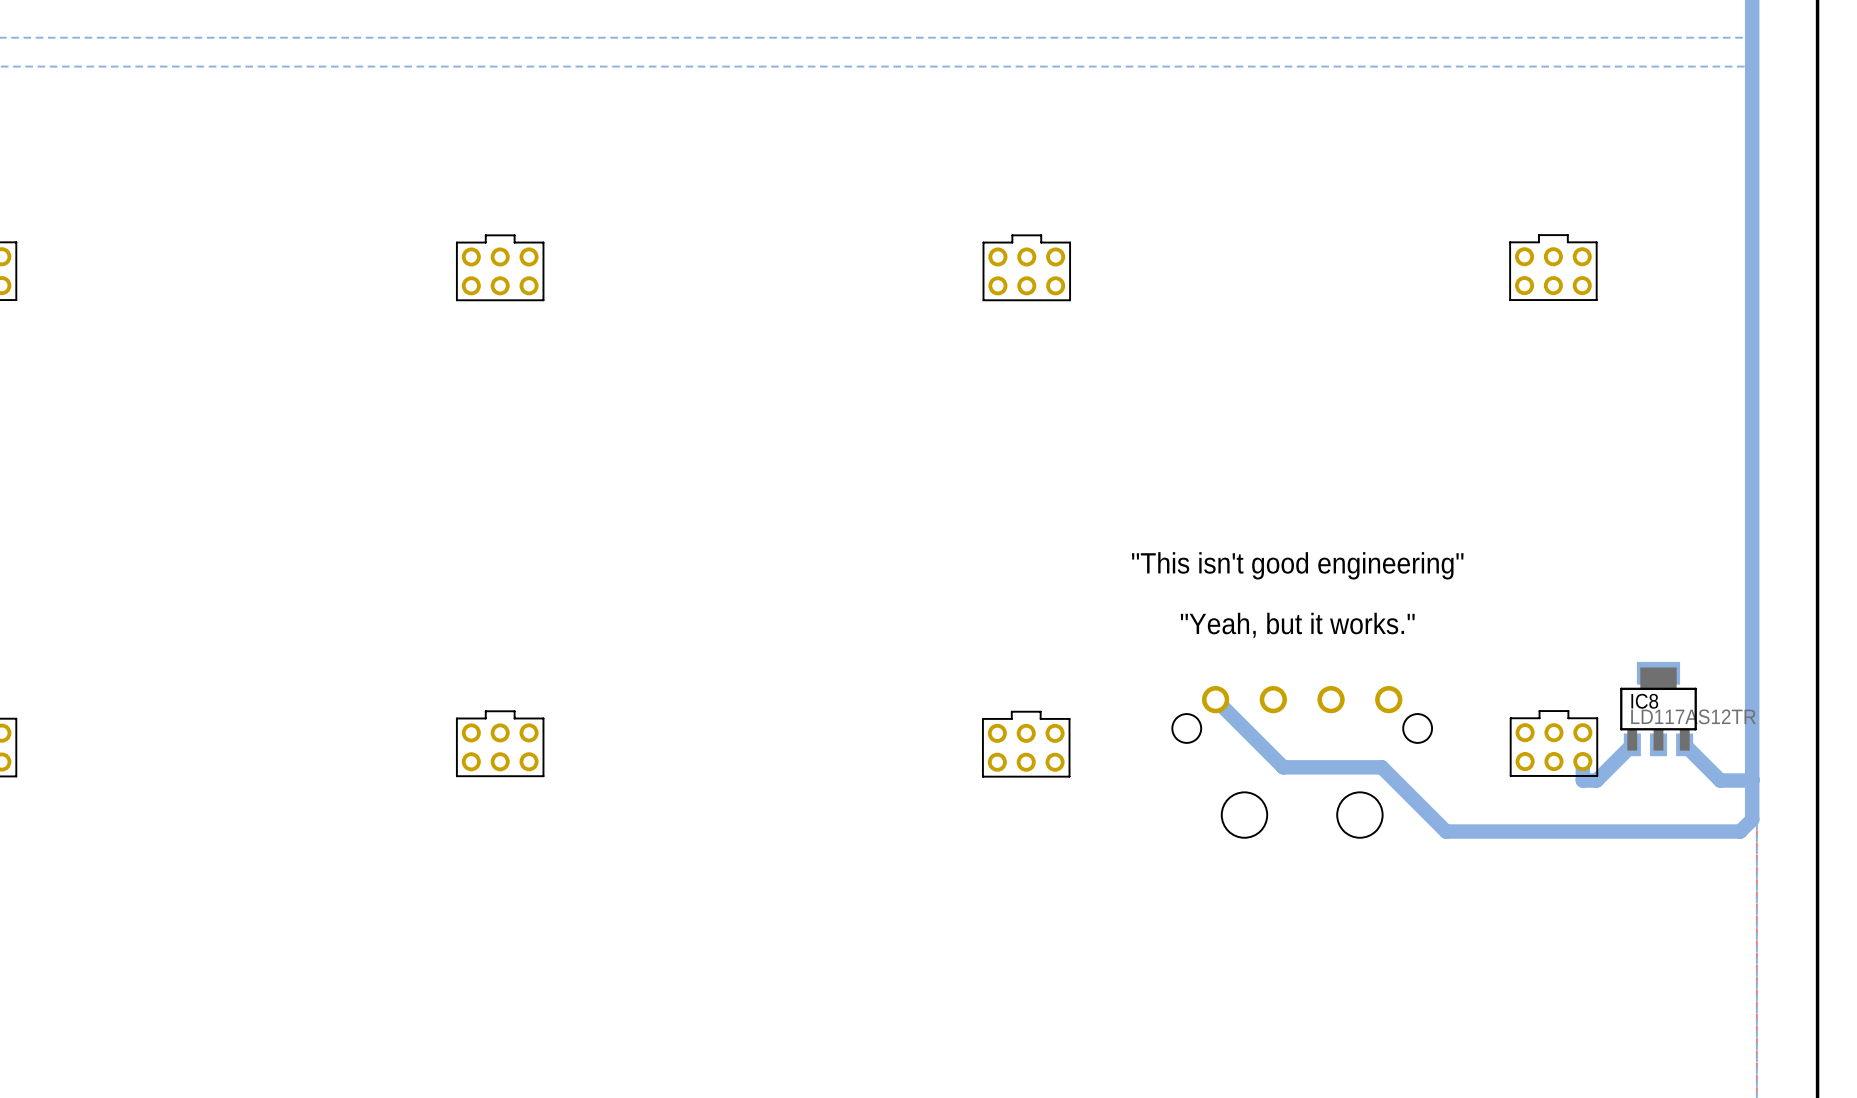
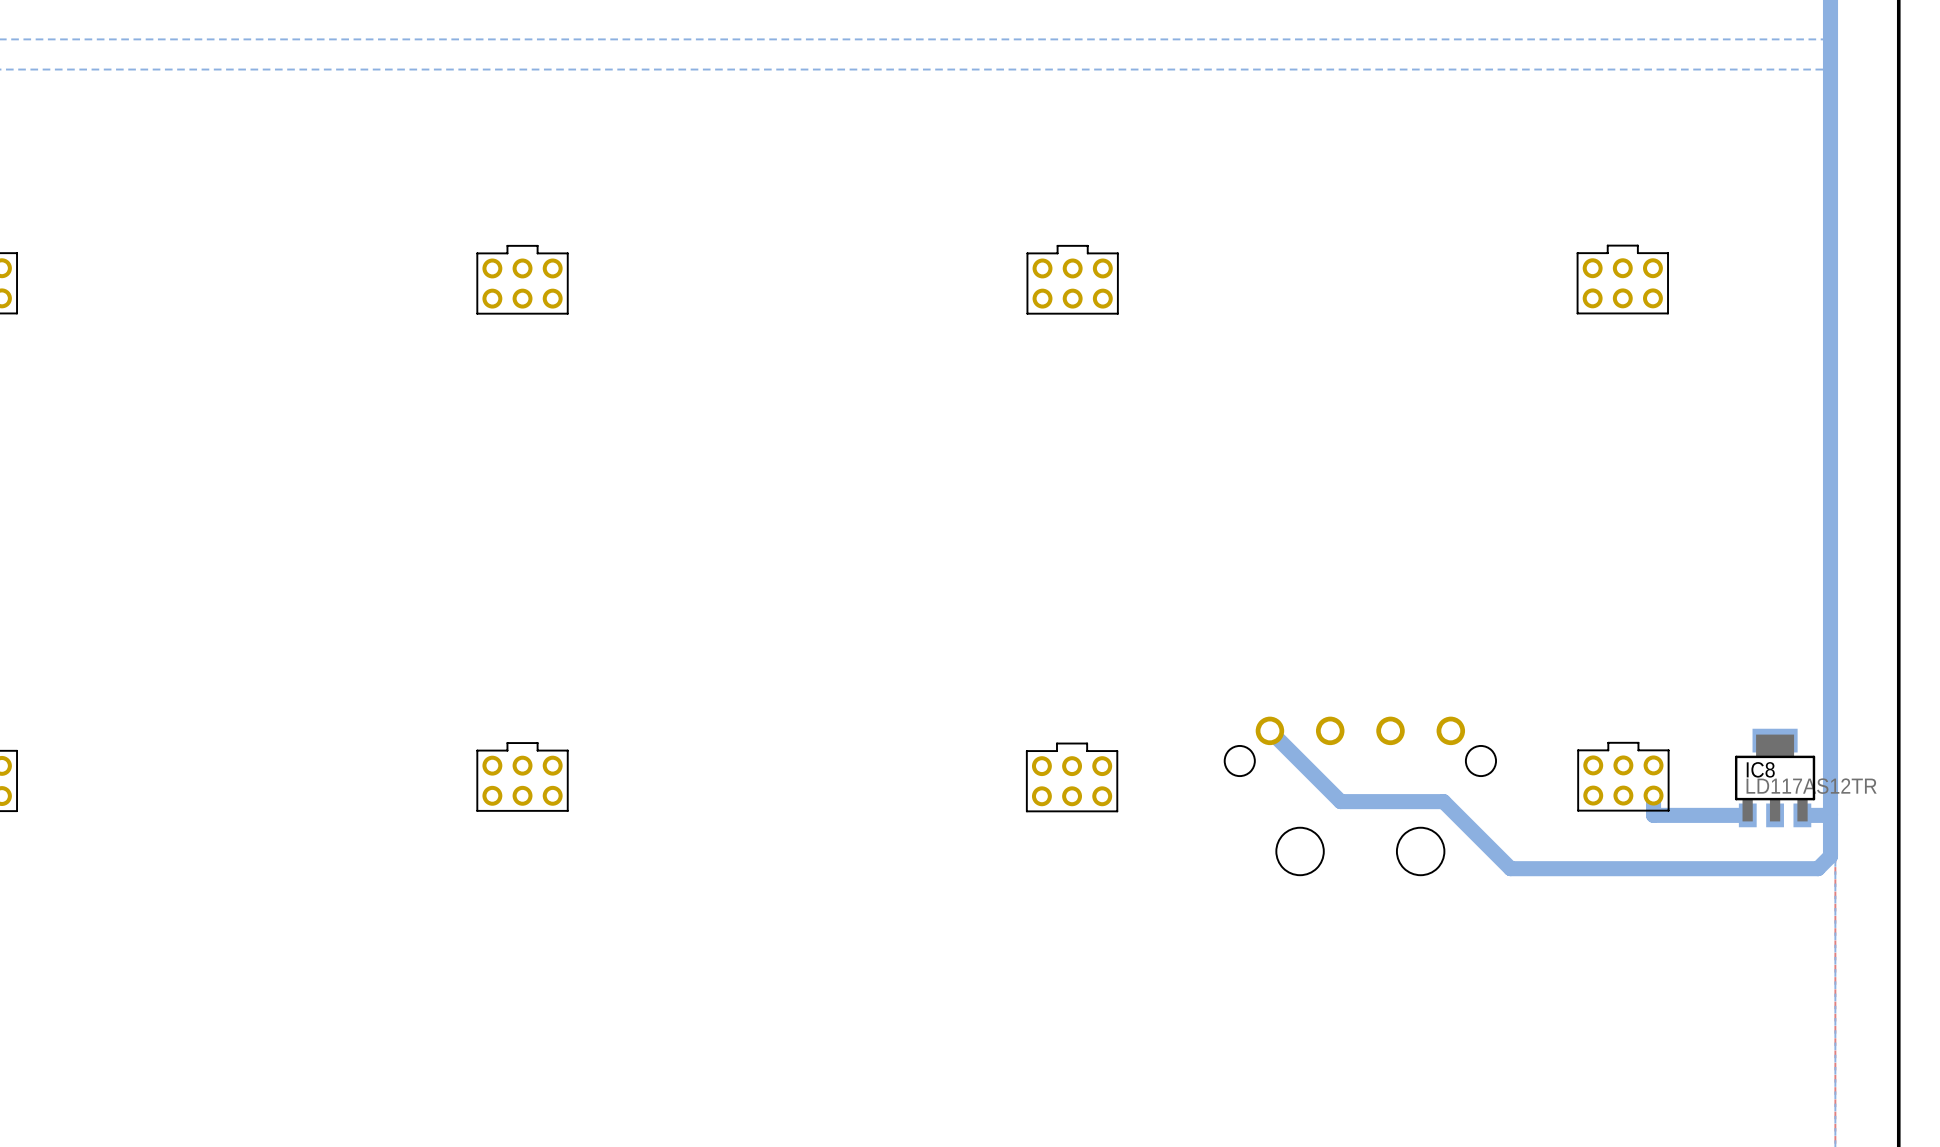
text: "This isn't good engineering" (1297, 565) -> none
text: "Yeah, but it works." (1297, 625) -> none
IC8 position: (1658, 709) -> (1775, 778)
bottom track: (1632, 744) (1596, 780) -> (1747, 815) (1668, 815)
bottom track: (1684, 744) (1720, 780) (1725, 780) -> none

